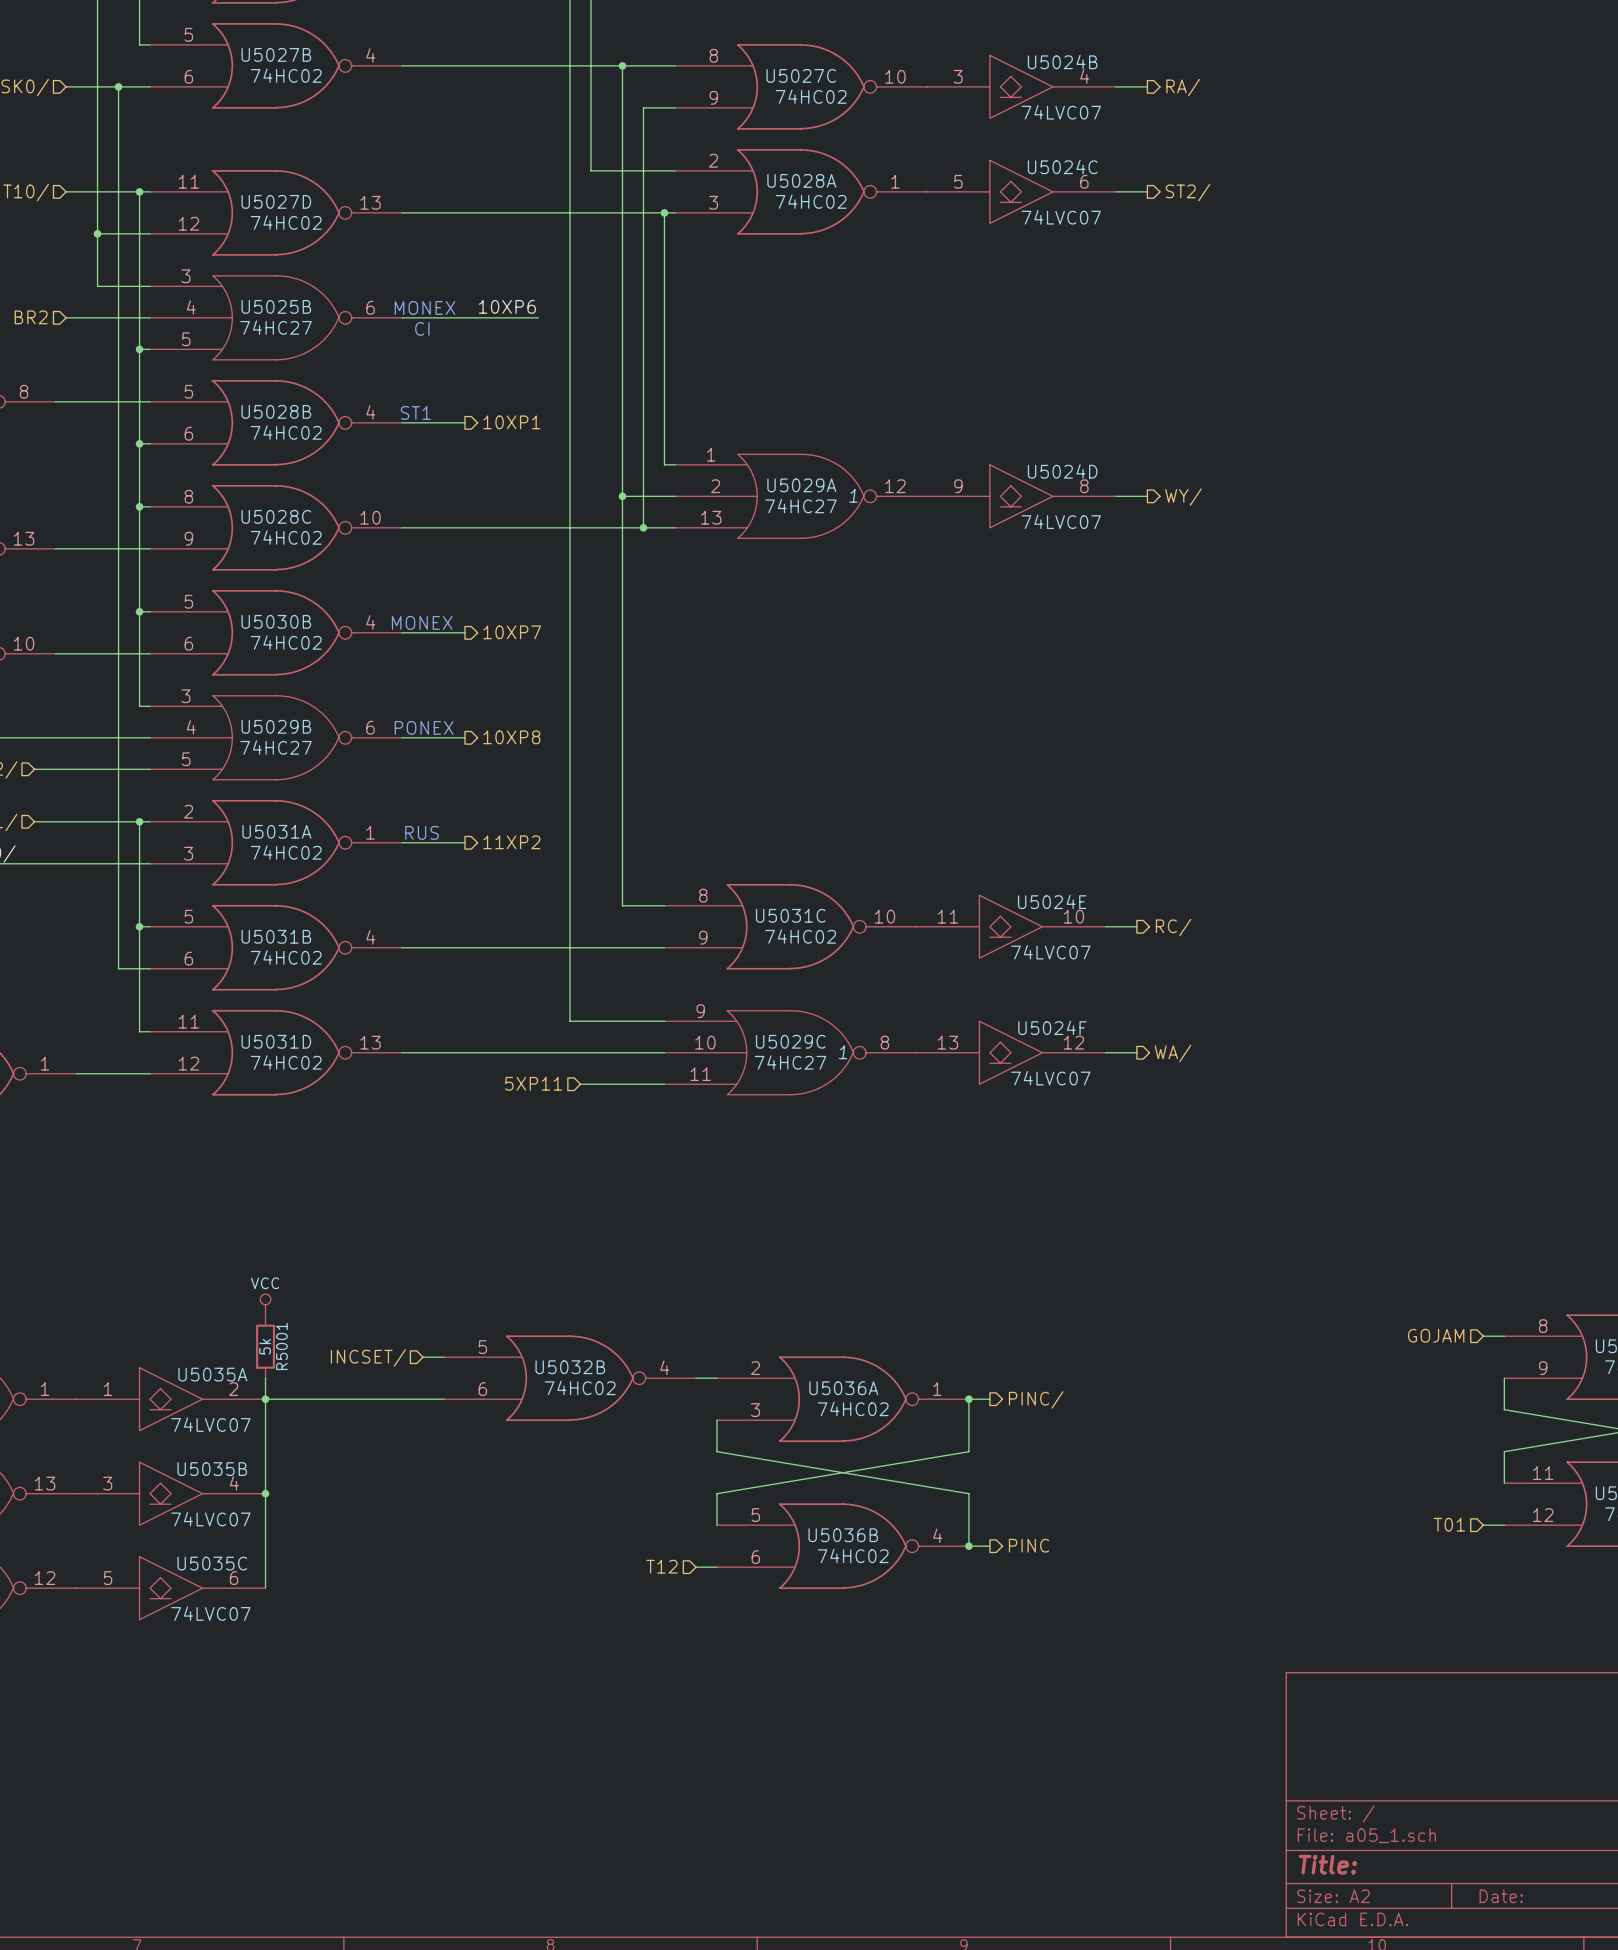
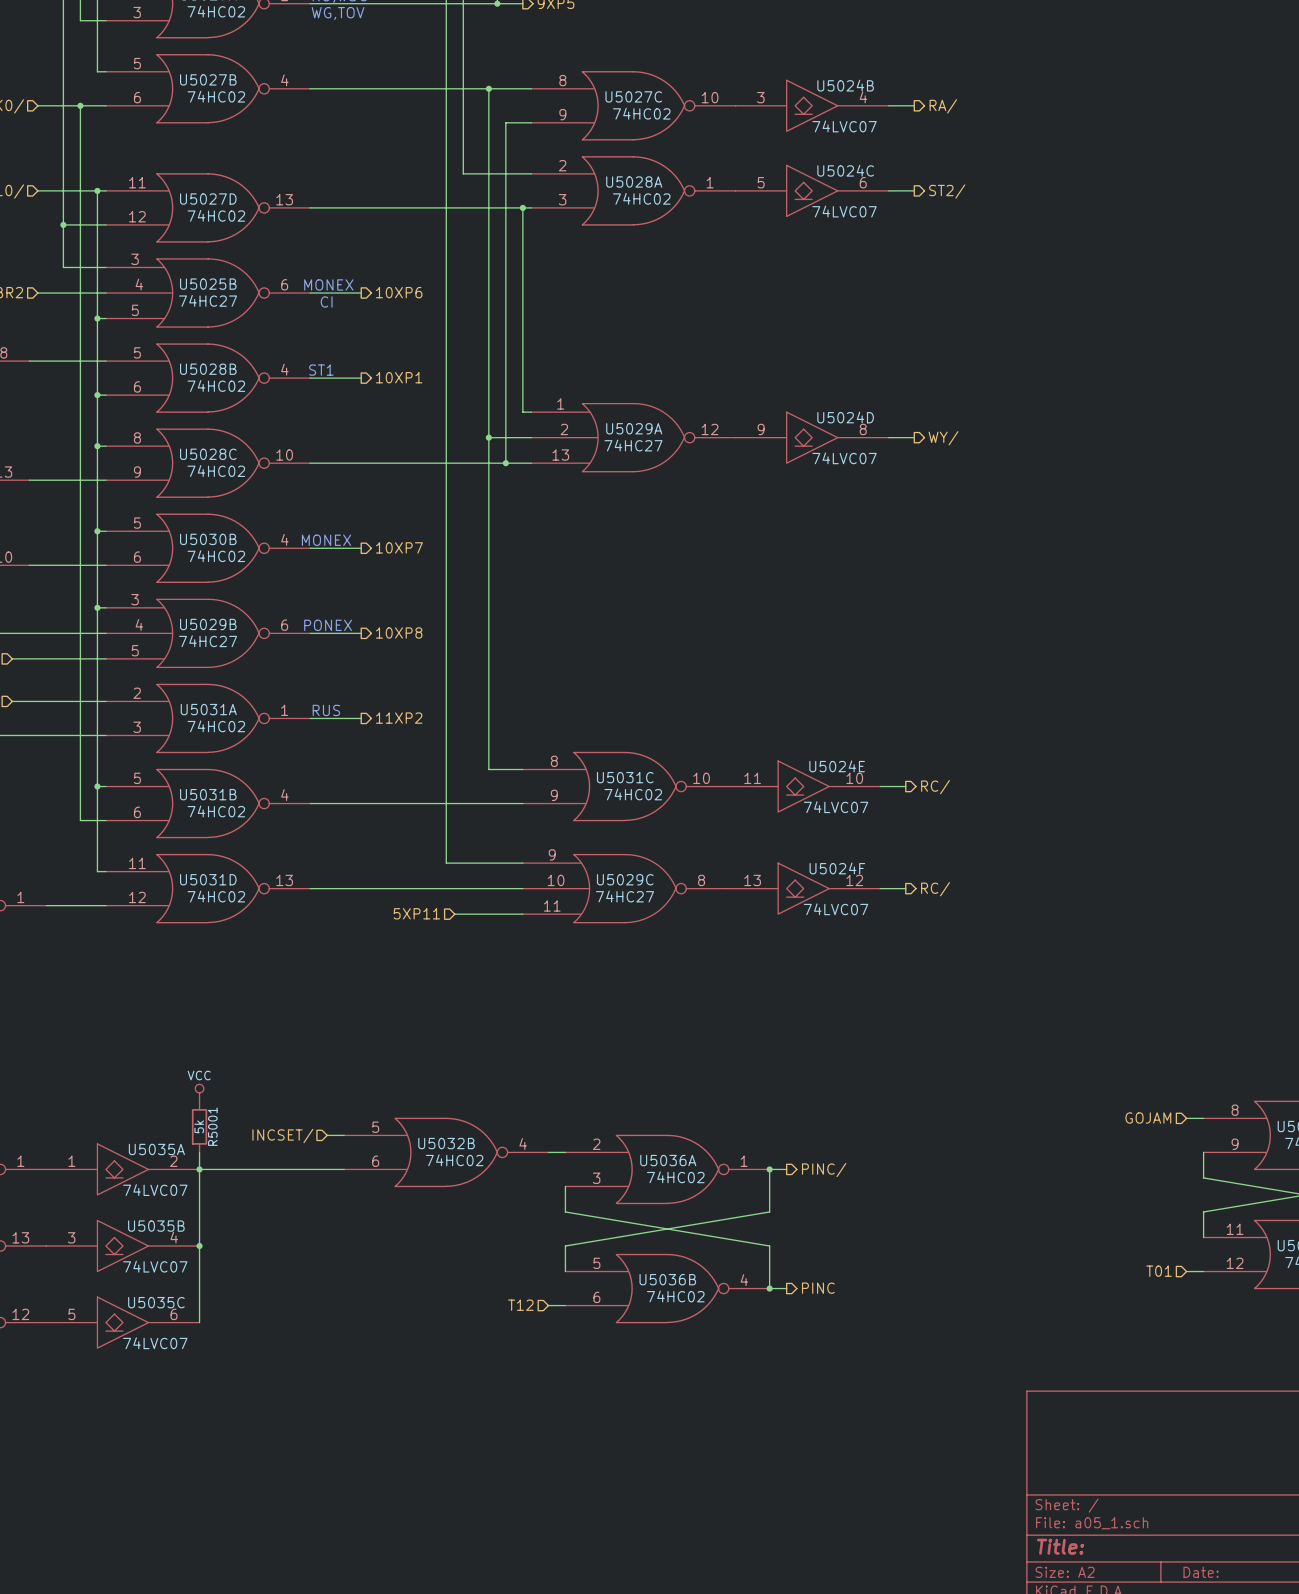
label: 10XP6 (507, 306) -> none
wire: (465, 317) (538, 317) -> none
hierarchical label: none -> 10XP6 (399, 292)
U5029A text: 1 (853, 495) -> none
wire: none -> (97, 607) (97, 701)
junction: none -> (97, 607)
junction: (139, 821) -> none
U5029C text: 1 (842, 1052) -> none
hierarchical label: WA/ (1172, 1053) -> RC/ (935, 889)

